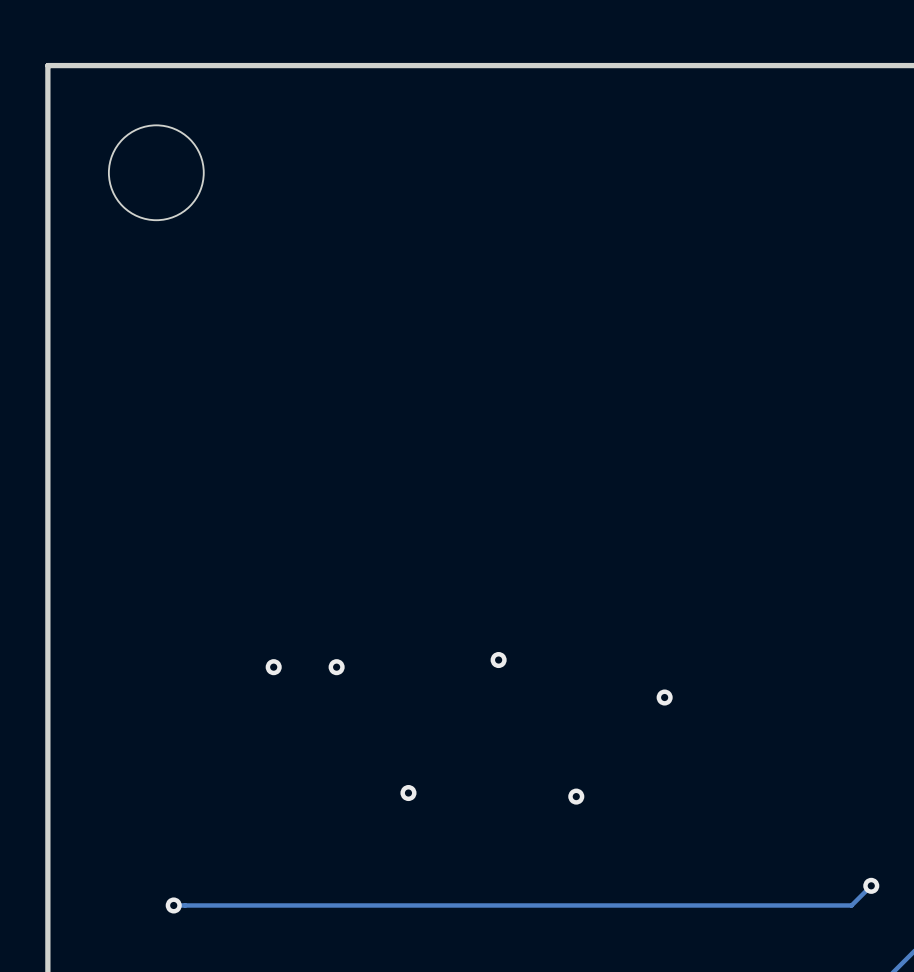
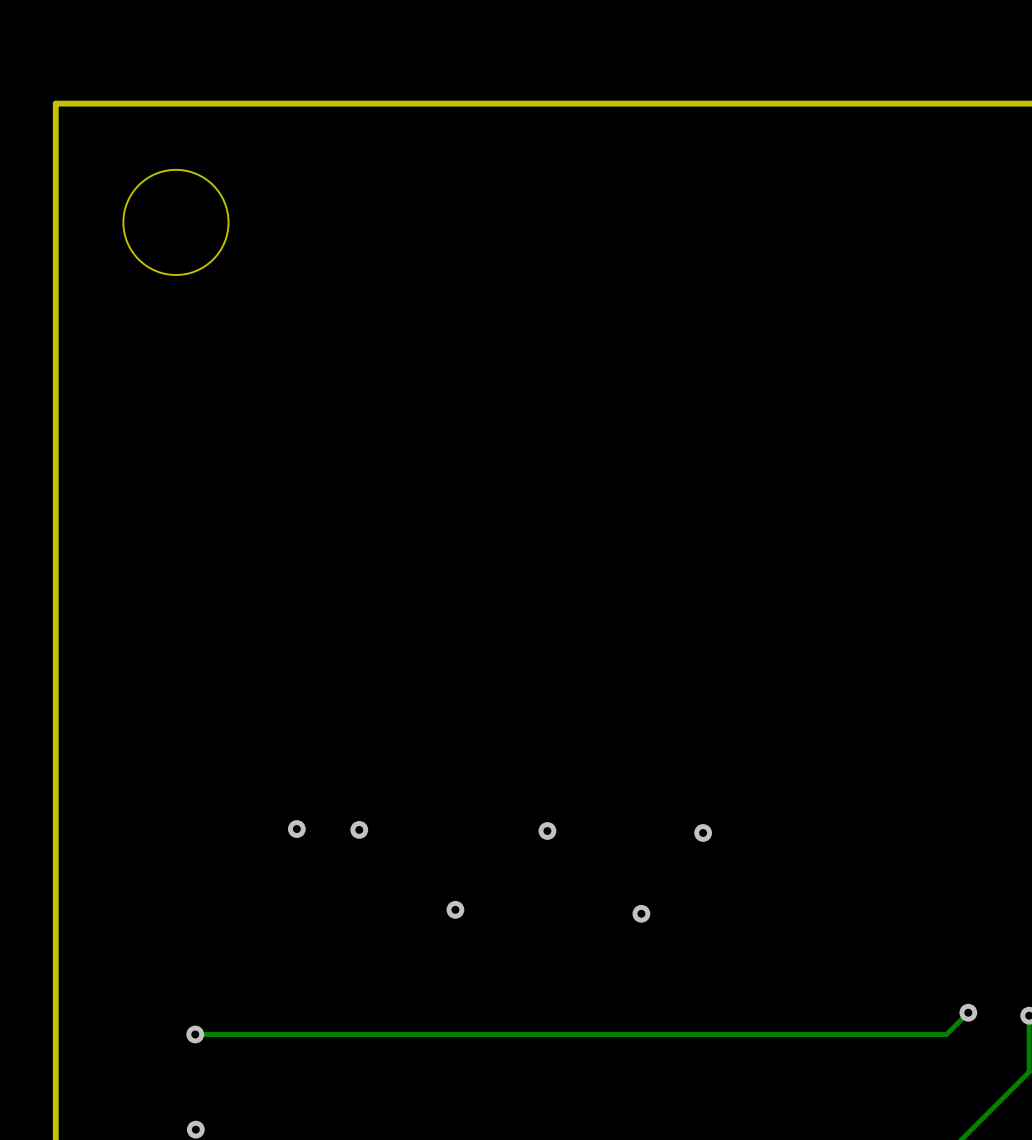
via position: (498, 660) -> (547, 831)
via: (273, 667) -> none
via: (336, 667) -> none
via position: (664, 697) -> (703, 832)
via: none -> (296, 829)
via: none -> (359, 829)

